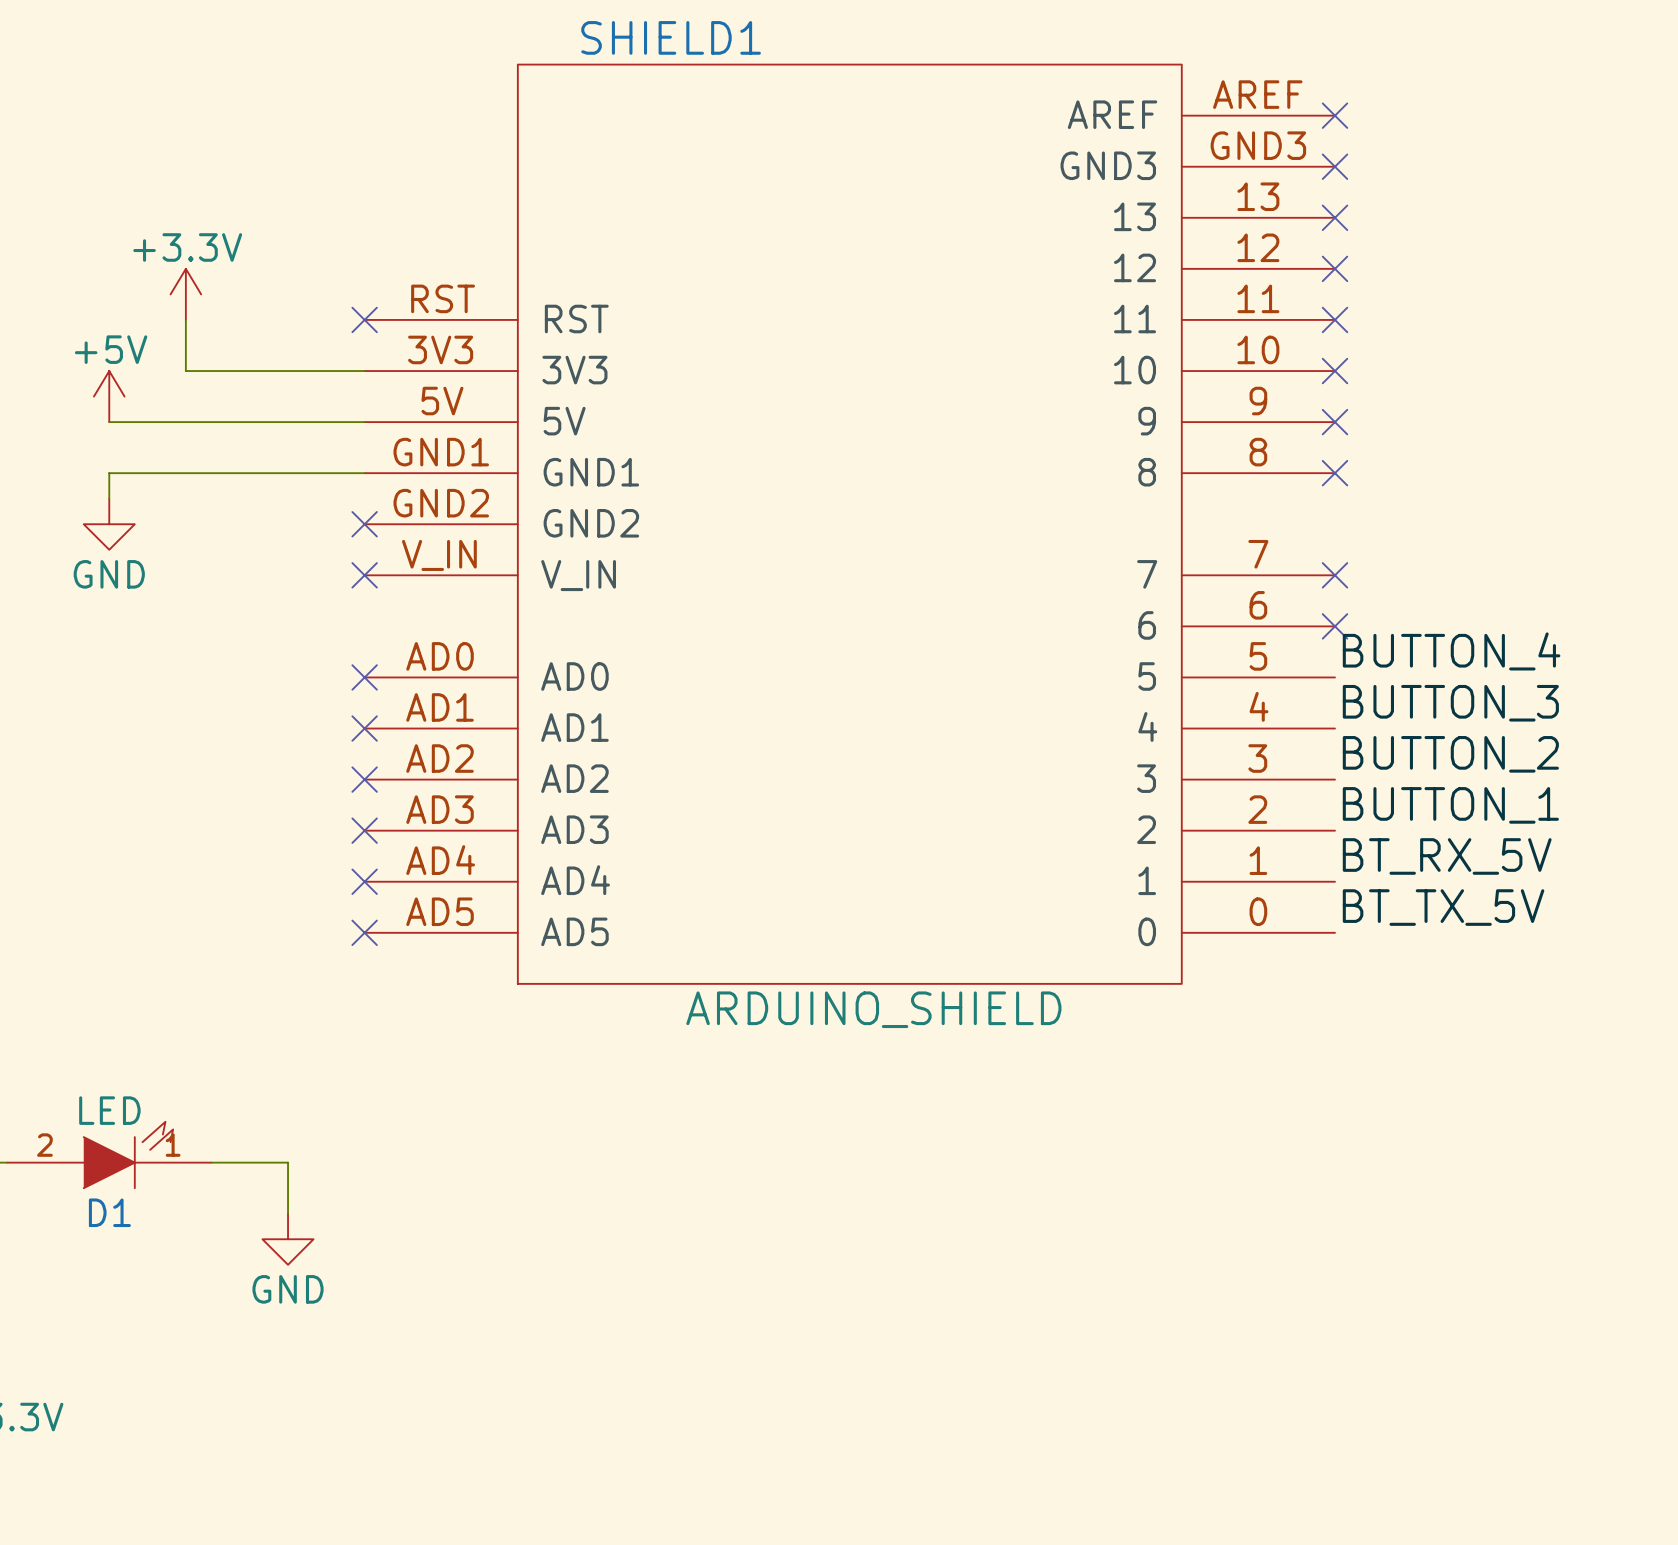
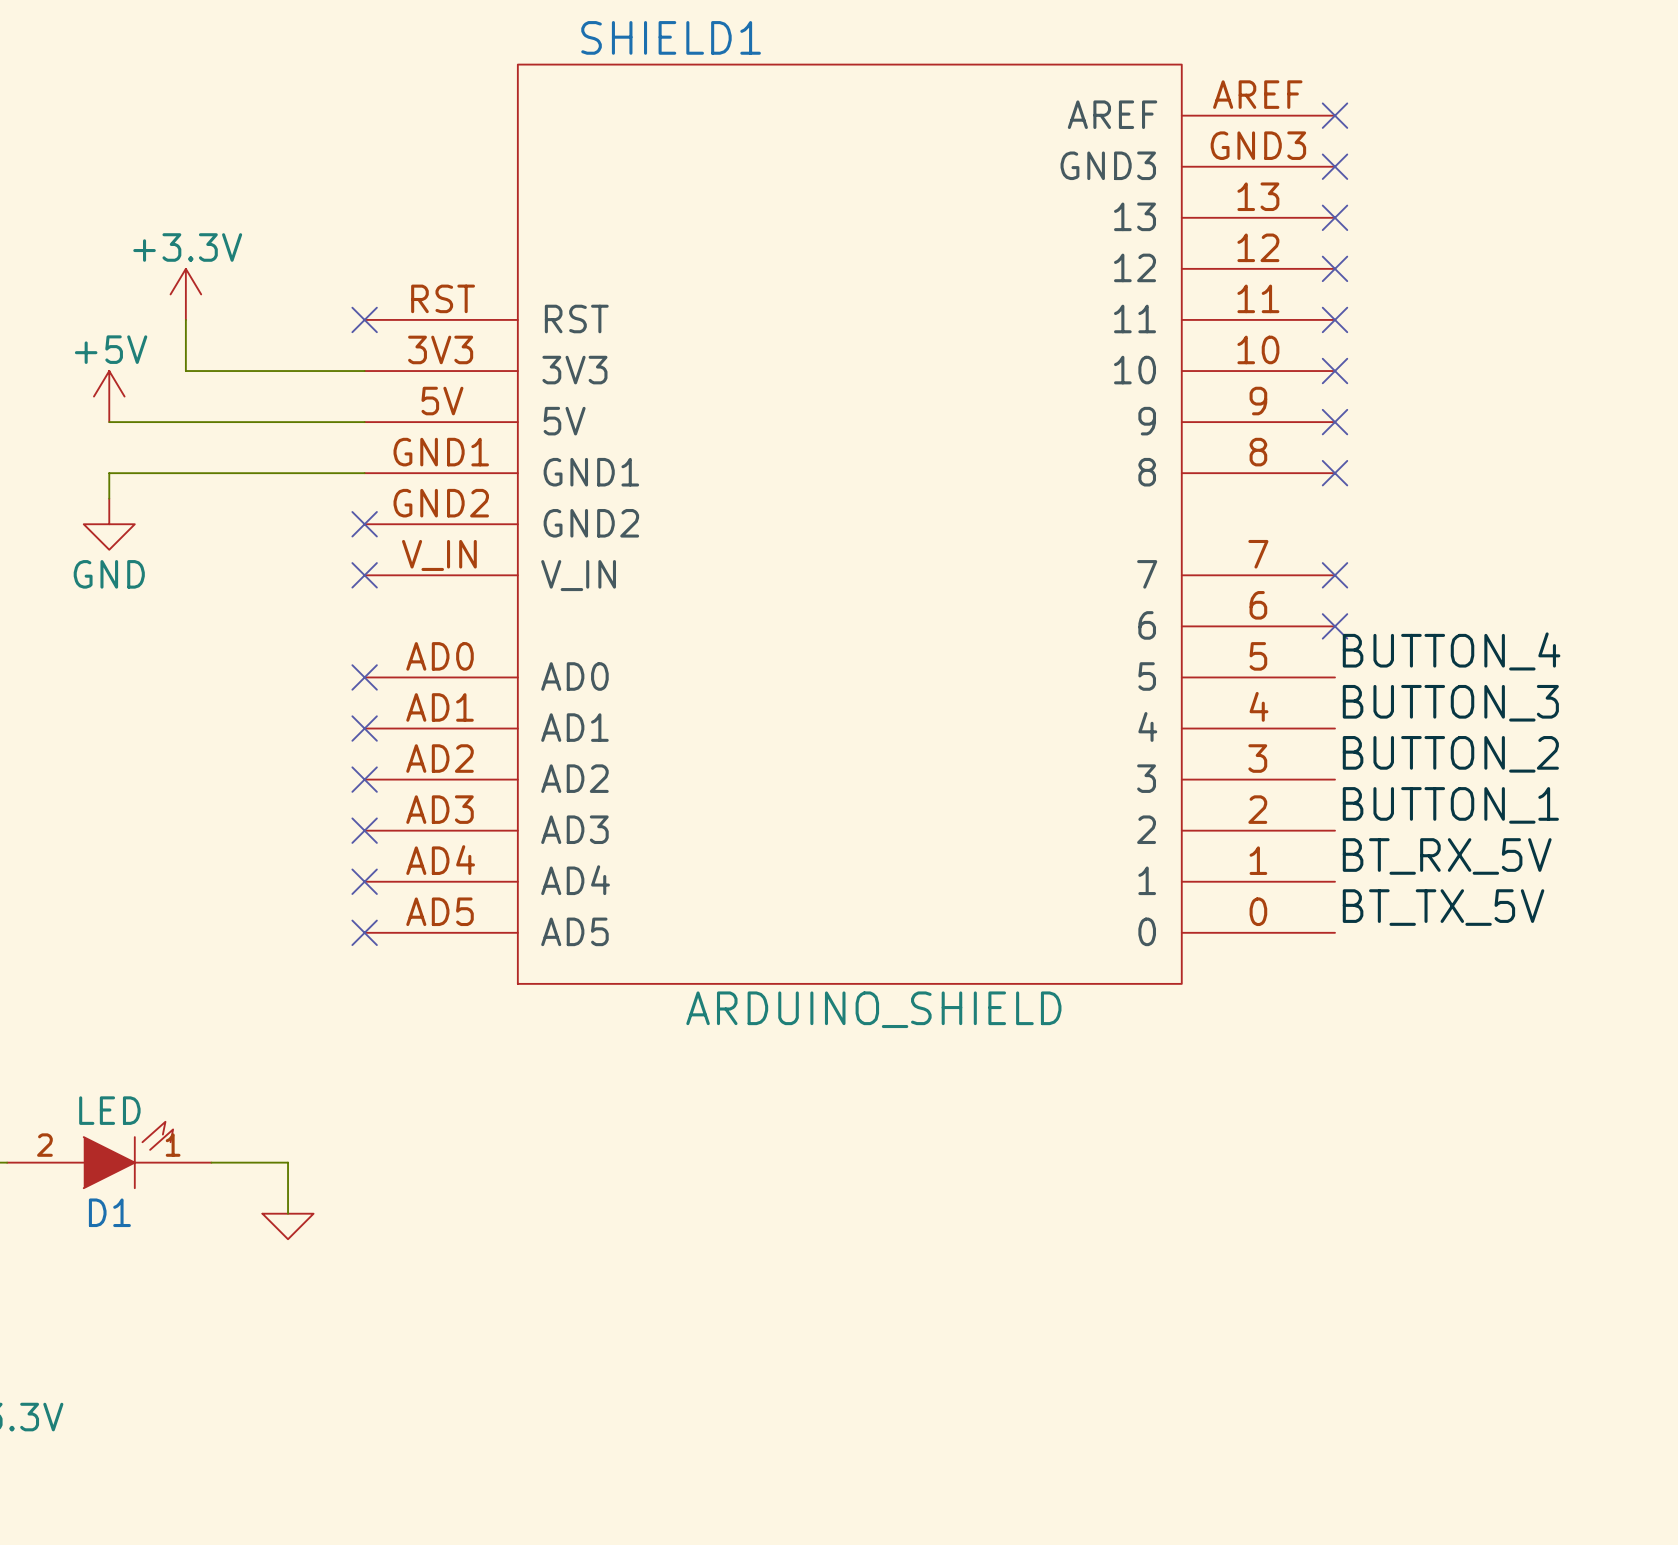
power symbol shape: [262, 1213, 314, 1265] -> [262, 1213, 314, 1240]
power symbol text: GND (288, 1289) -> none

